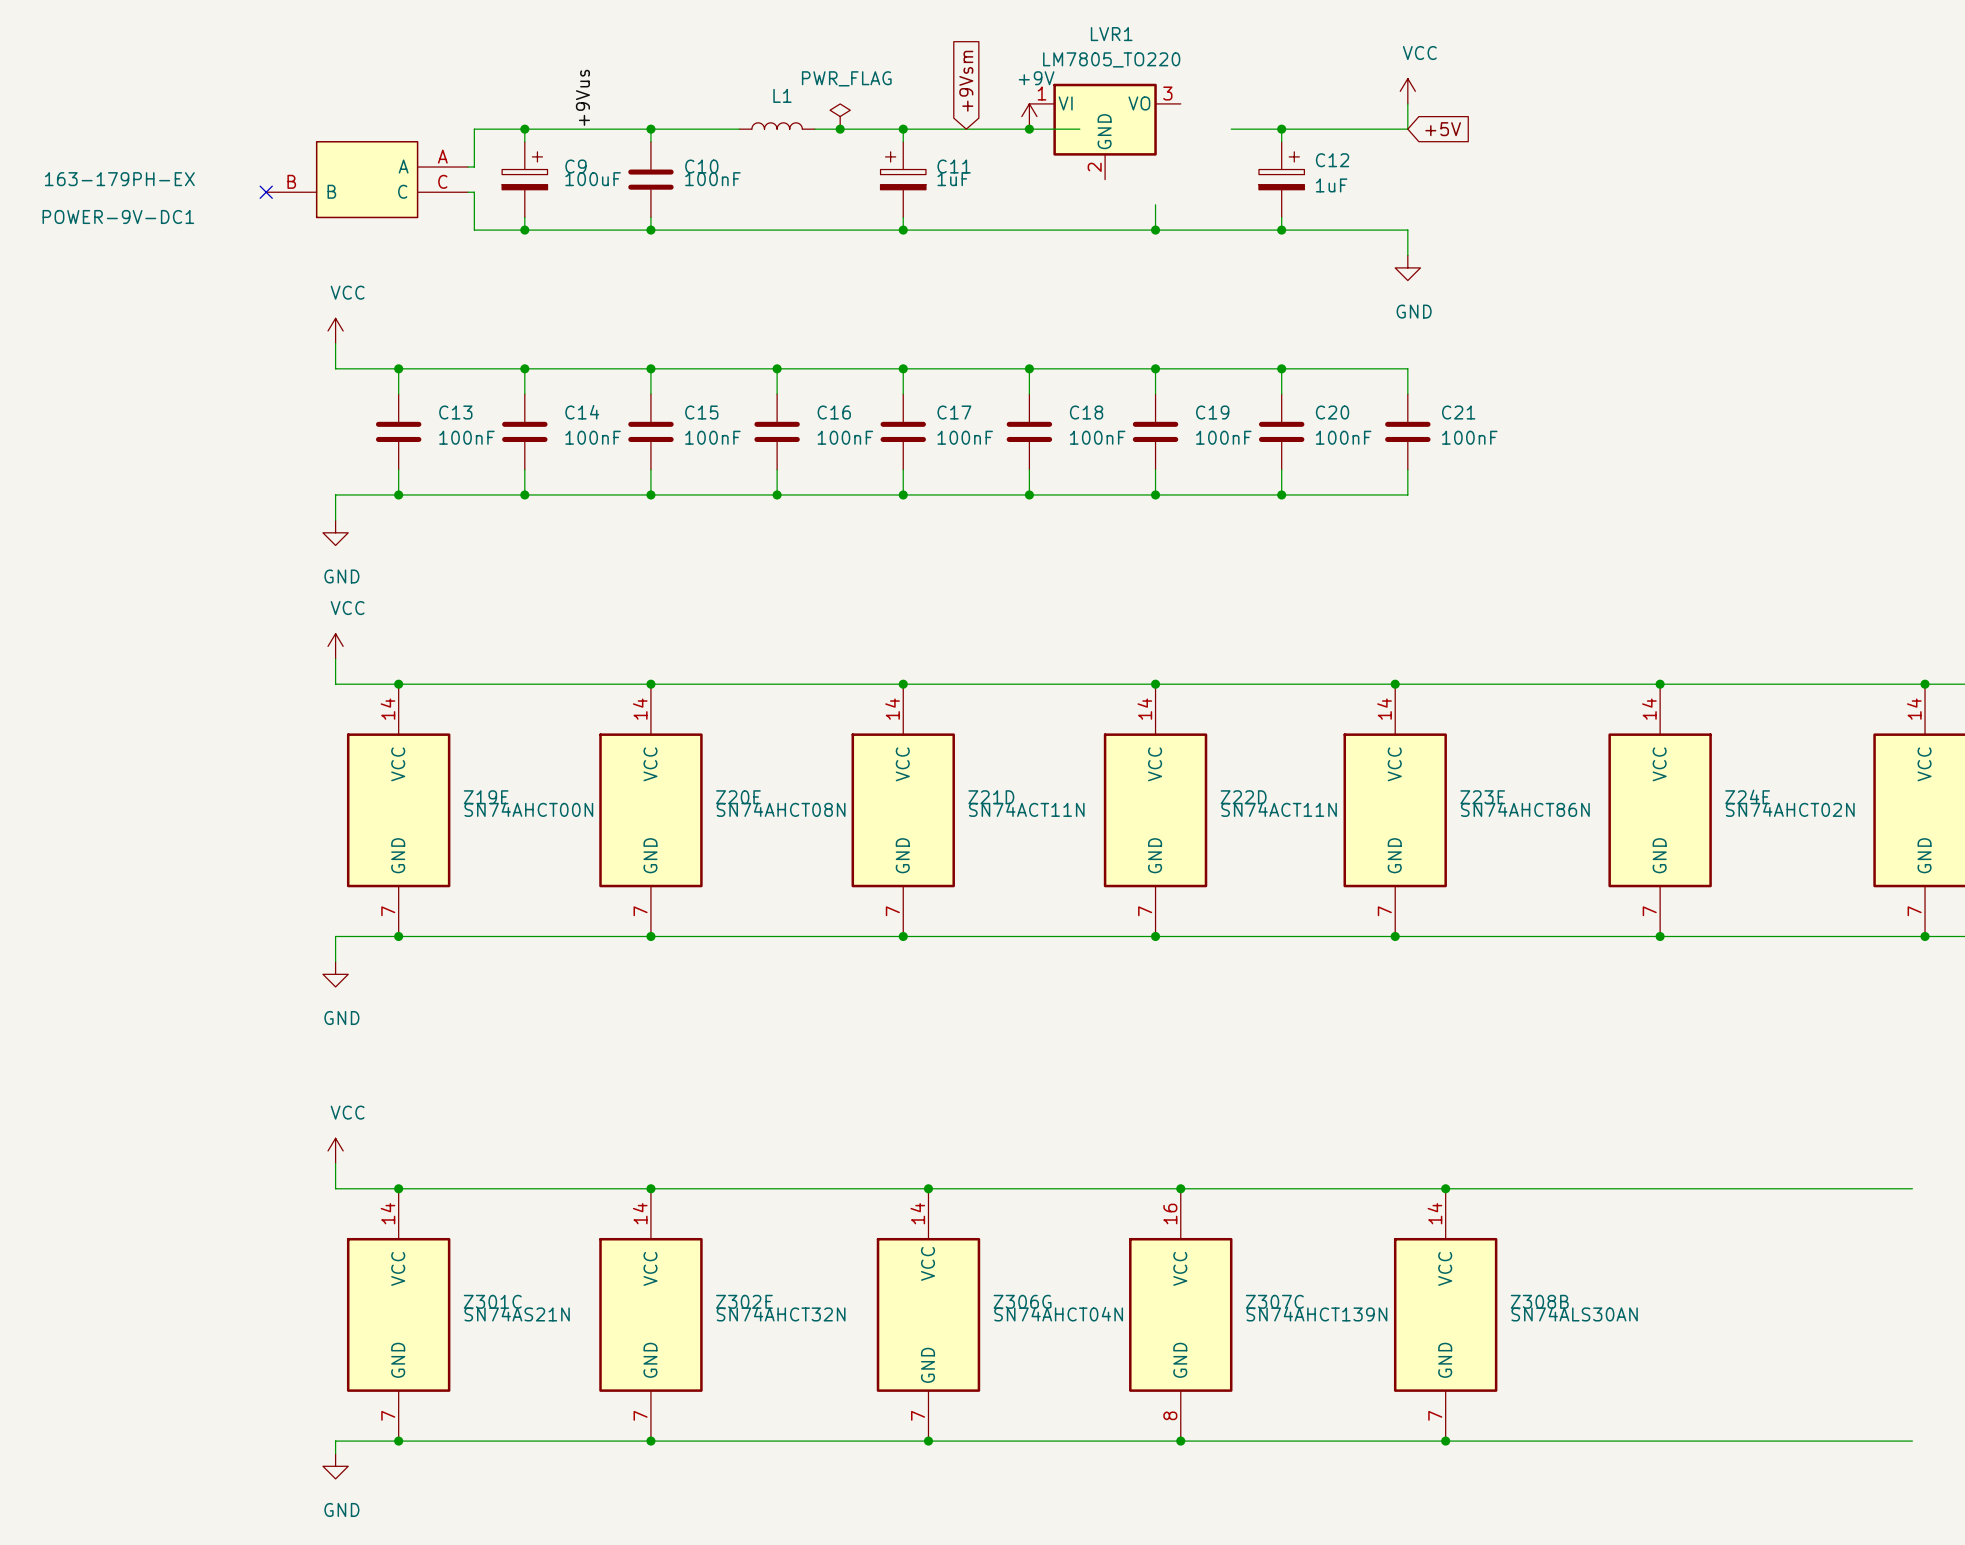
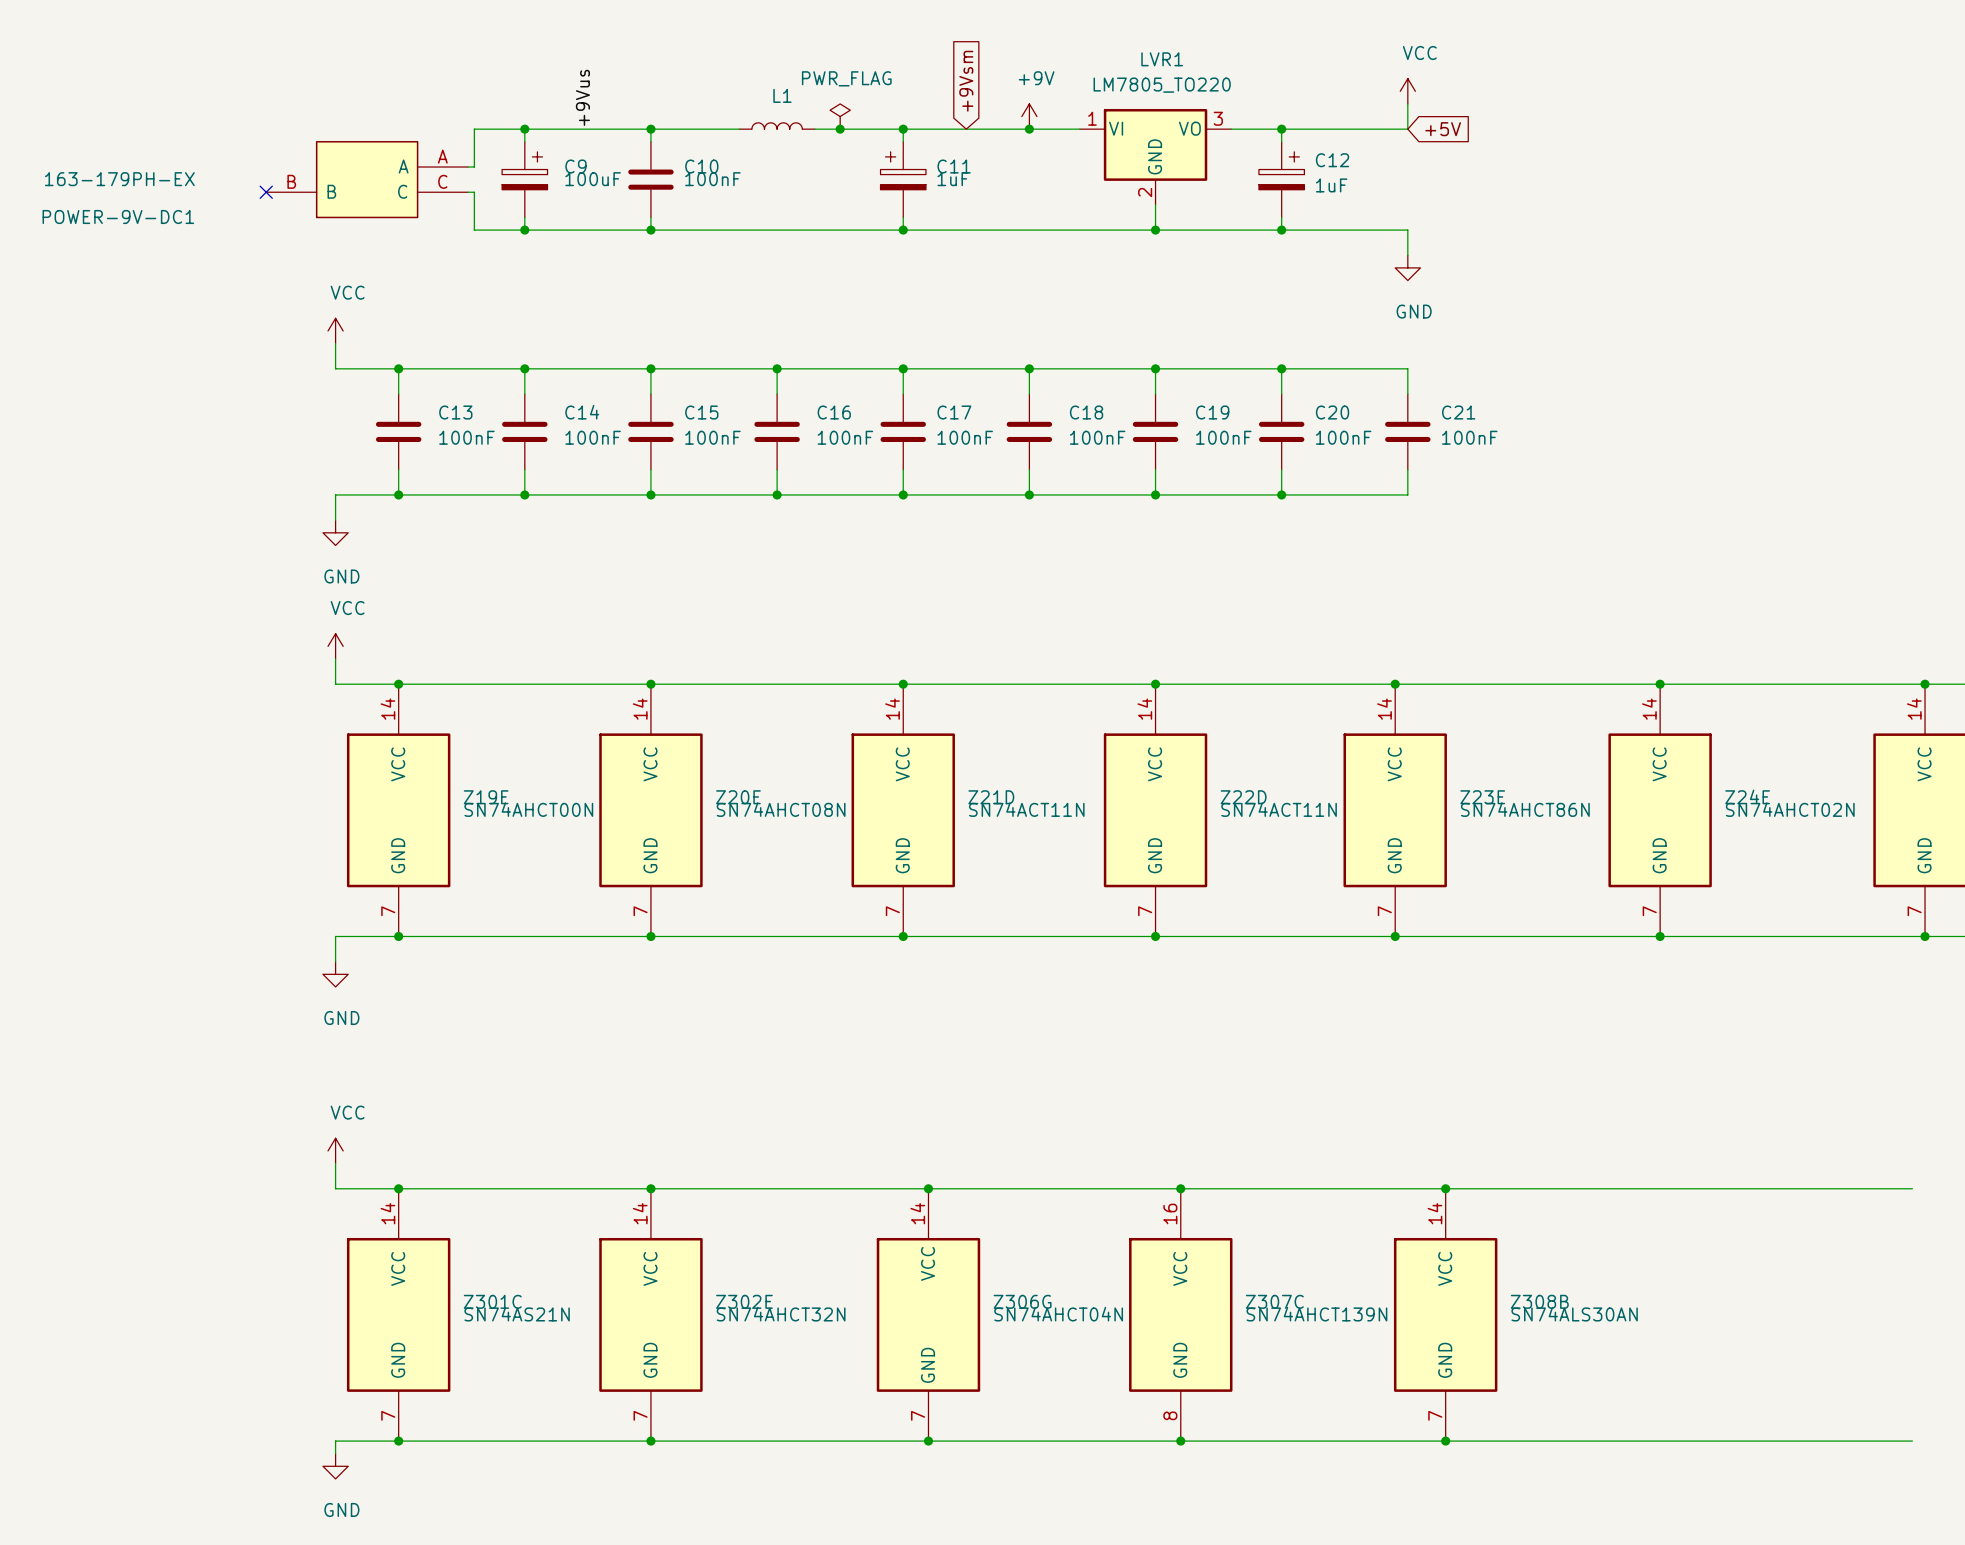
LVR1 position: (1105, 131) -> (1155, 156)

